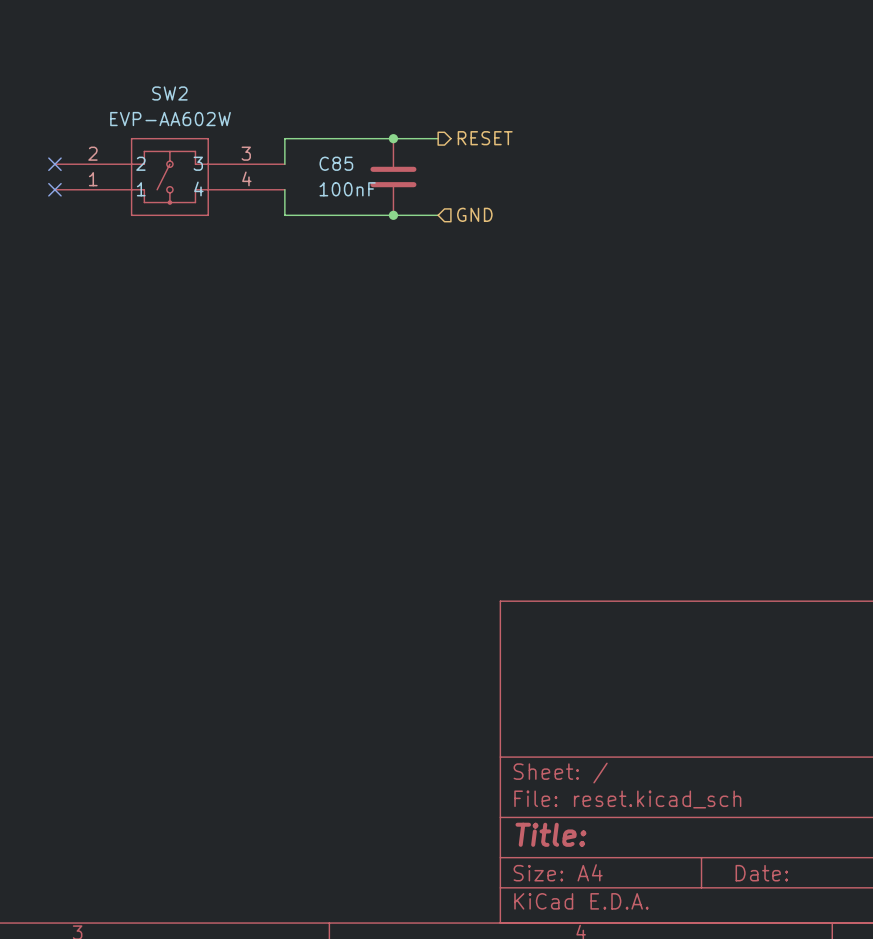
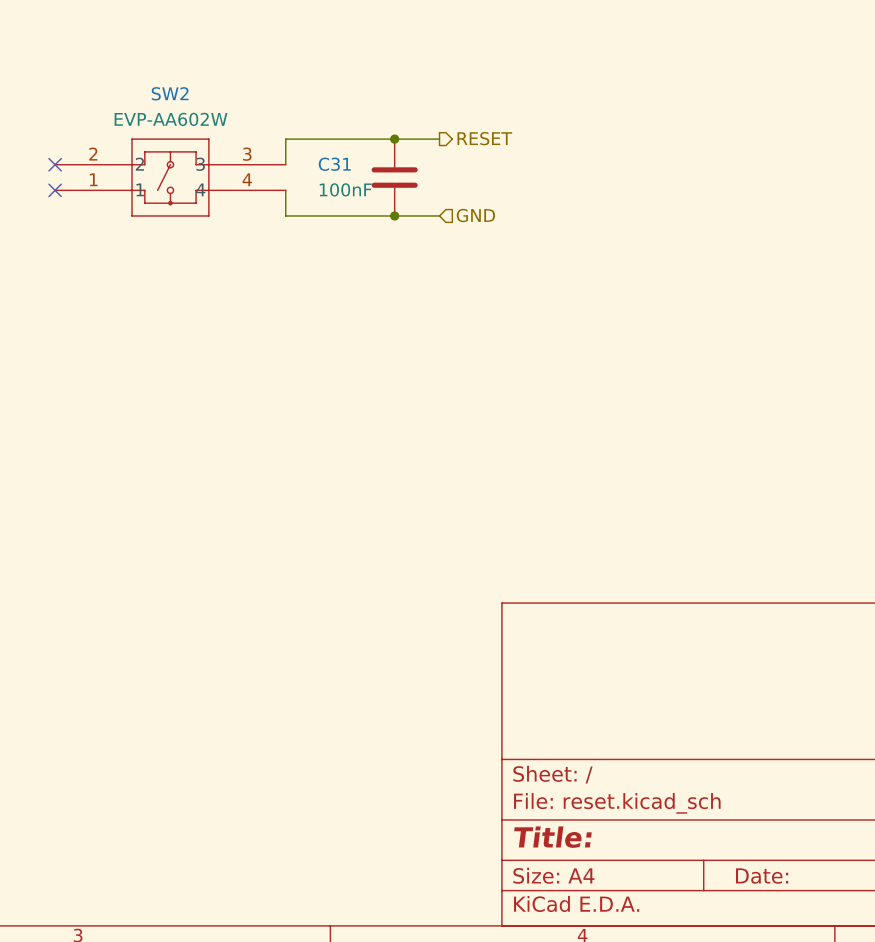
C85 name: C85 (336, 163) -> C31 (334, 164)

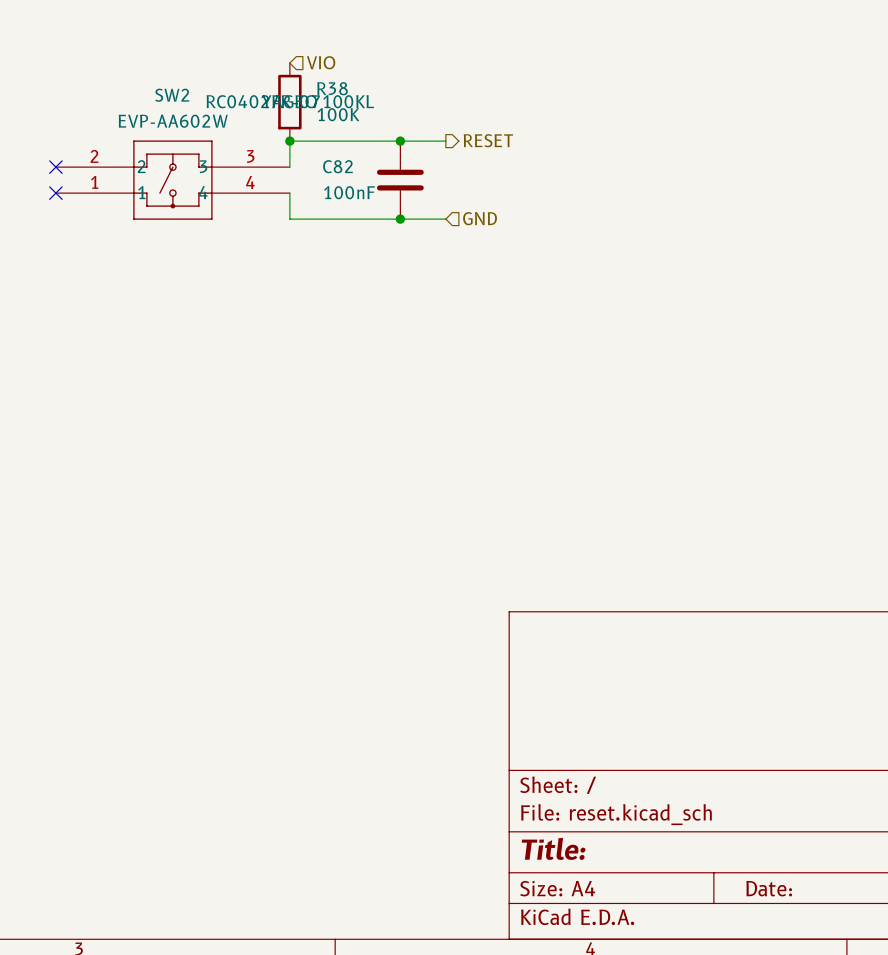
hierarchical label: none -> VIO (321, 62)
R38: none -> 100K (289, 102)
junction: none -> (289, 141)
C31 name: C31 (334, 164) -> C82 (337, 166)

